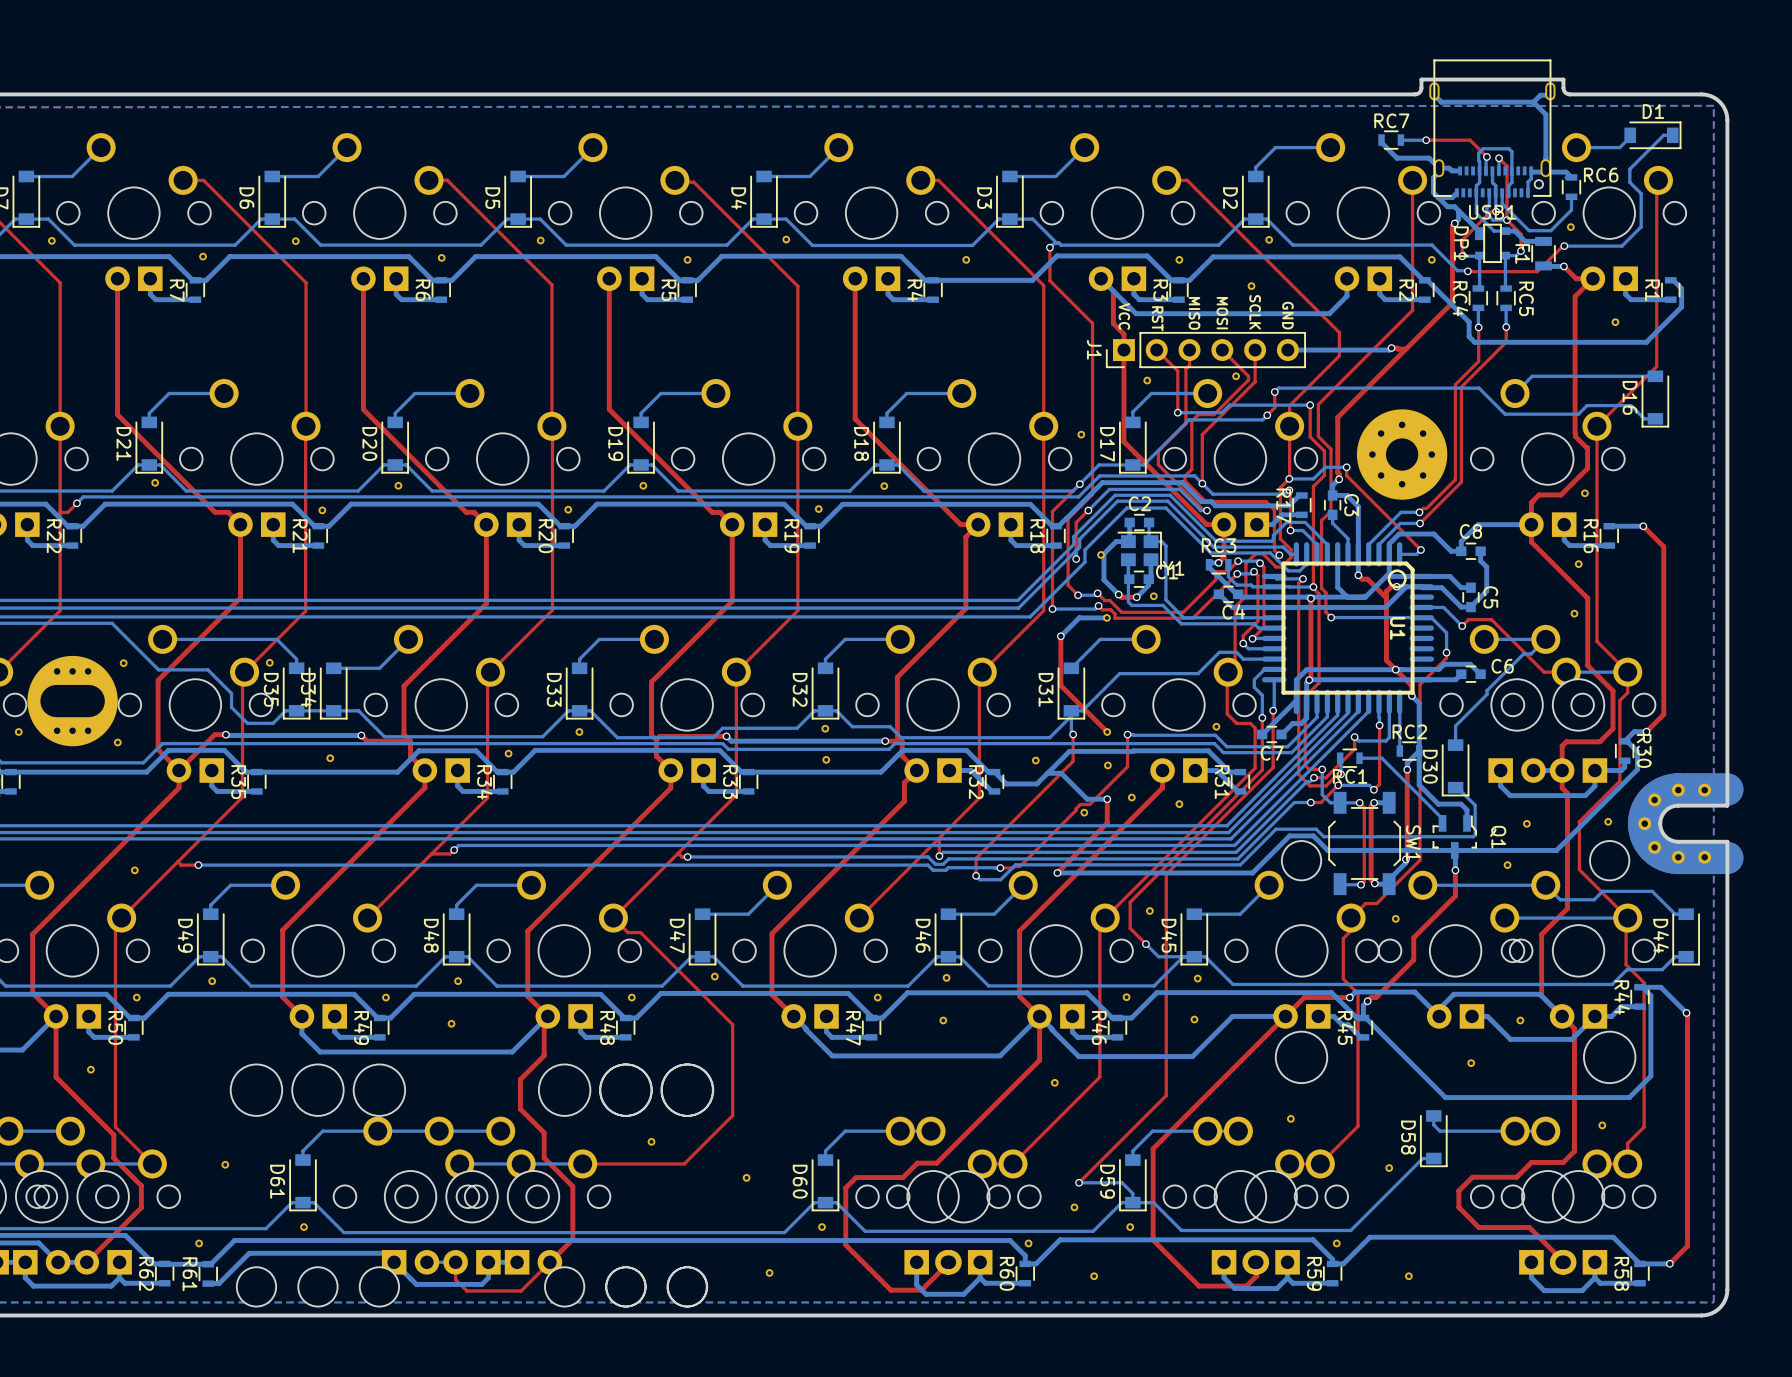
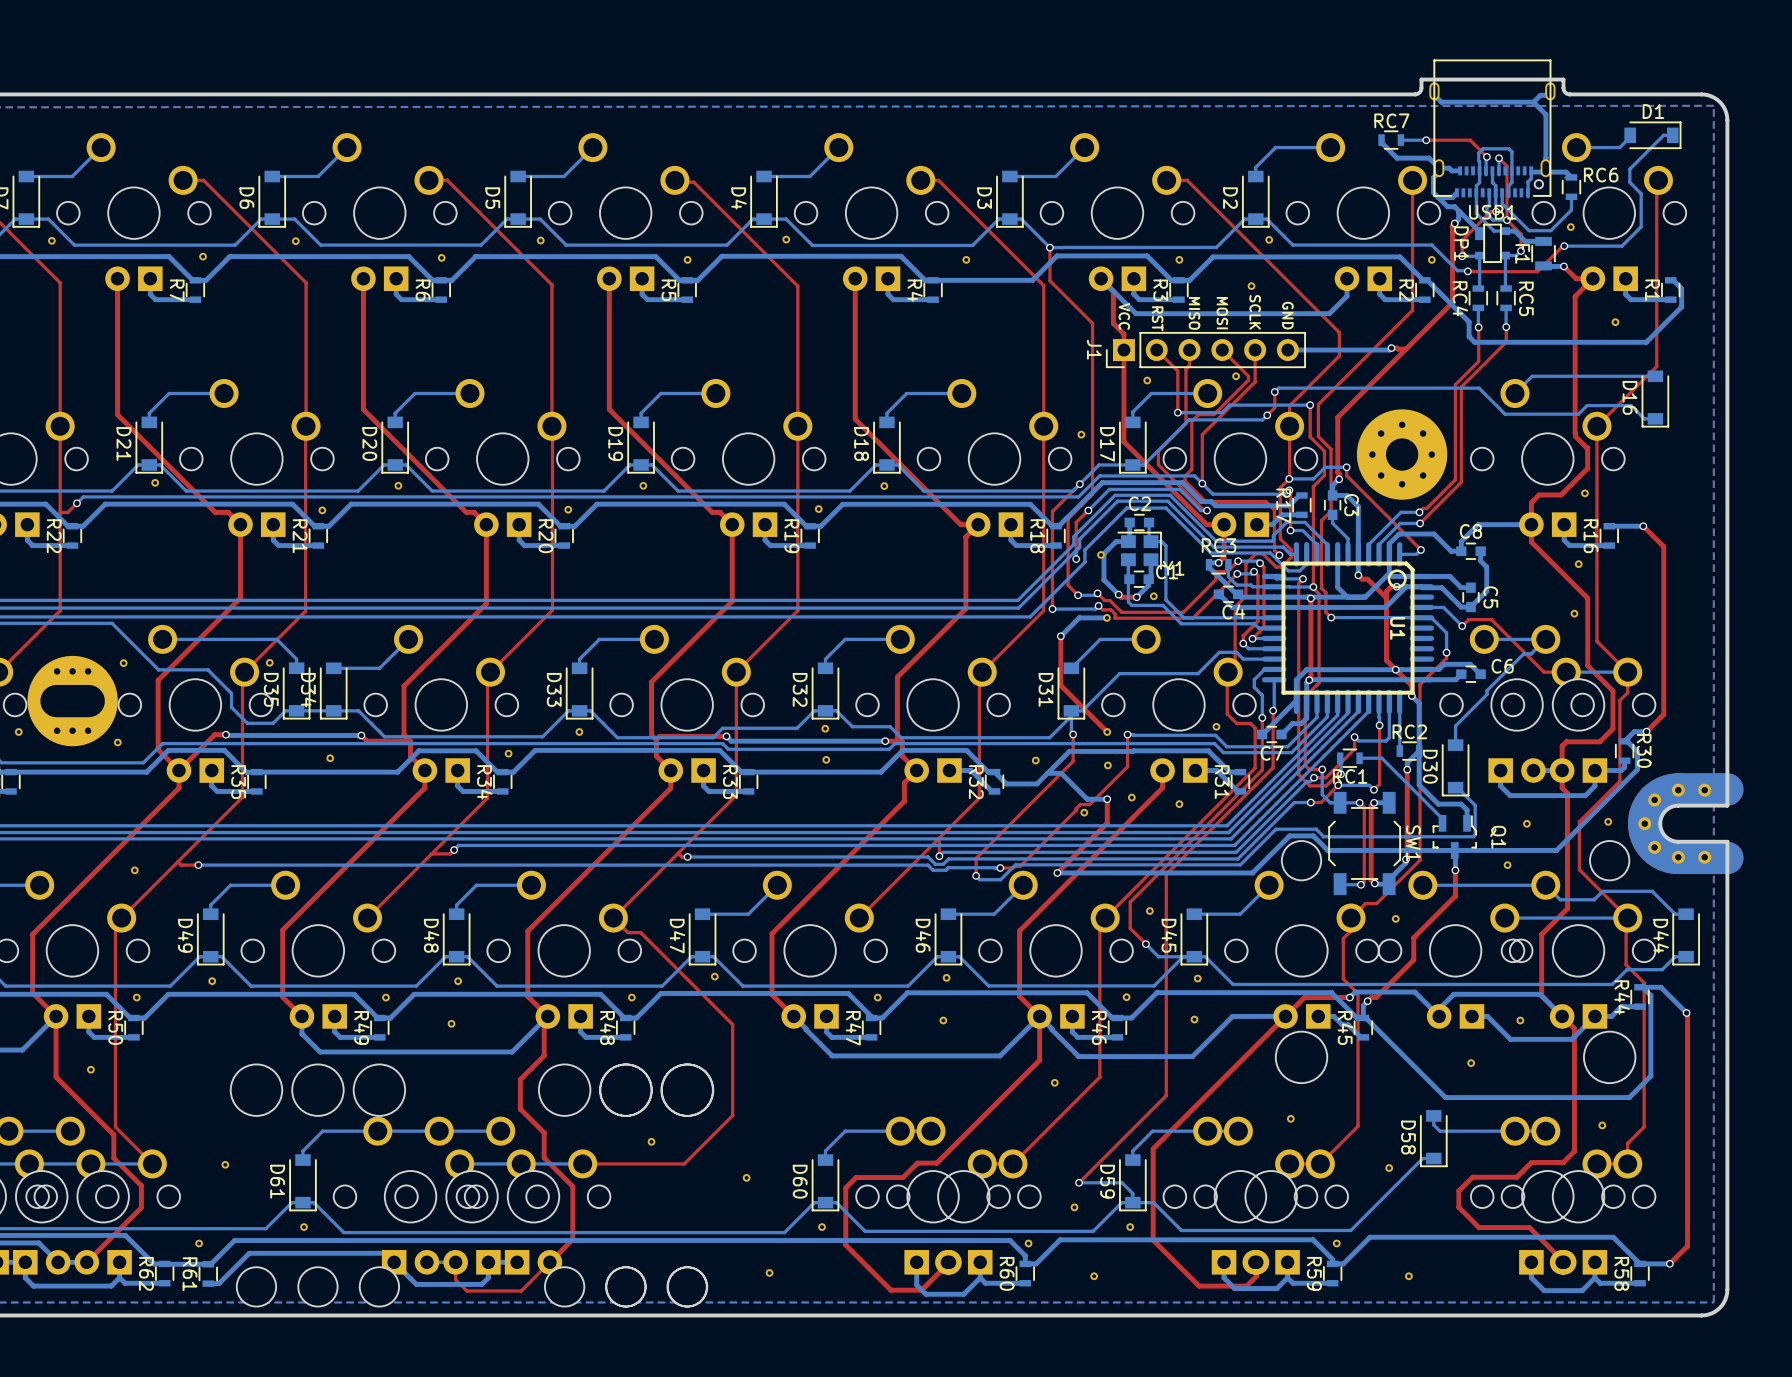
bottom track: (1021, 219) (1032, 219) (1056, 243) -> none
bottom track: (1218, 245) (1060, 245) (1054, 243) (1049, 247) -> (1218, 245) (1216, 247) (1049, 247) (1021, 219)

